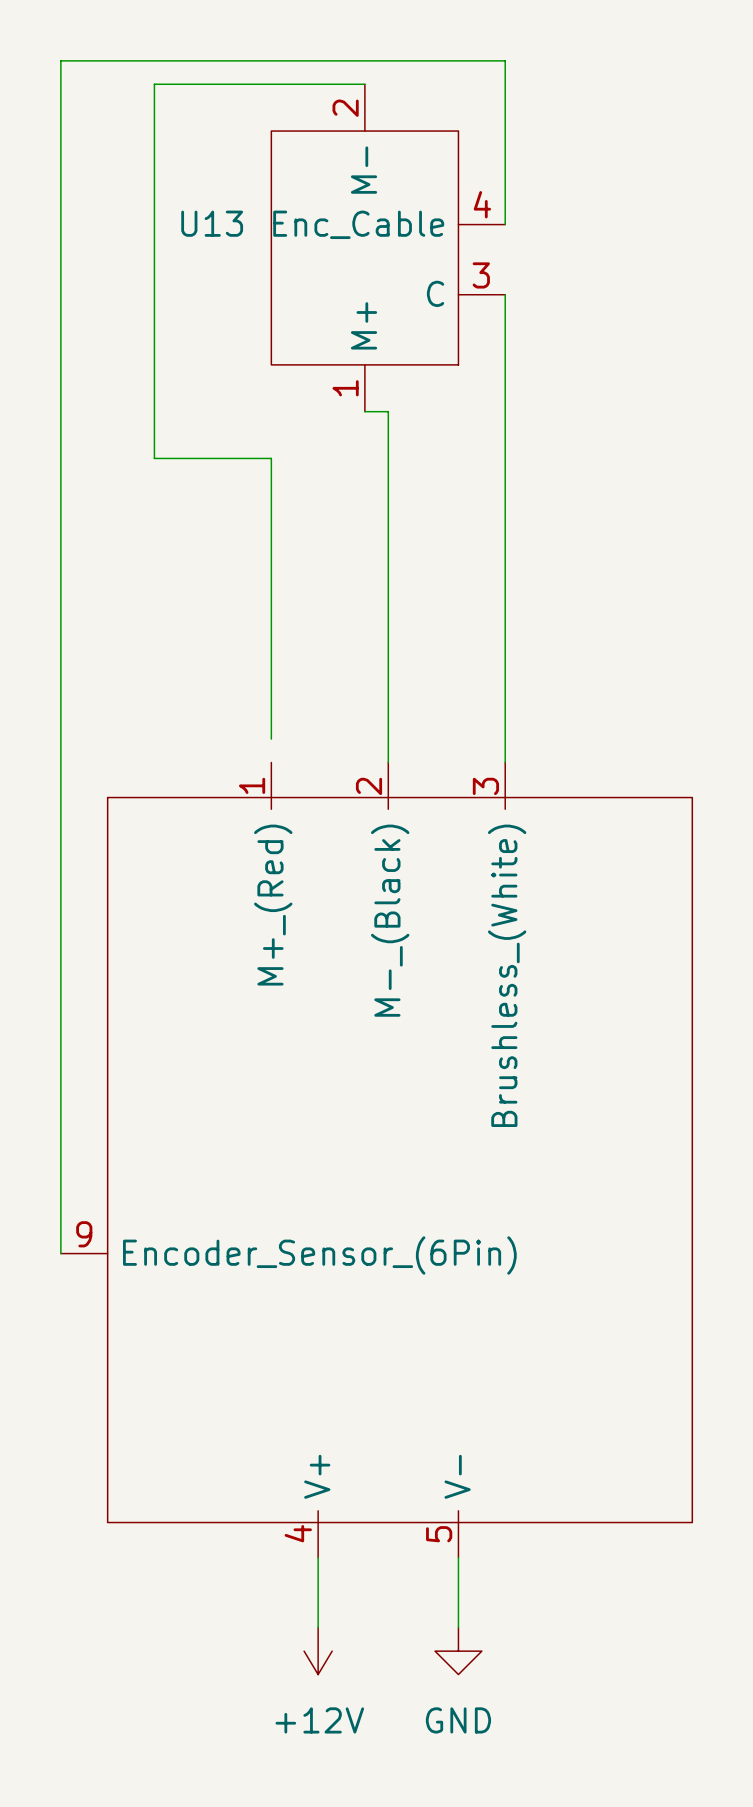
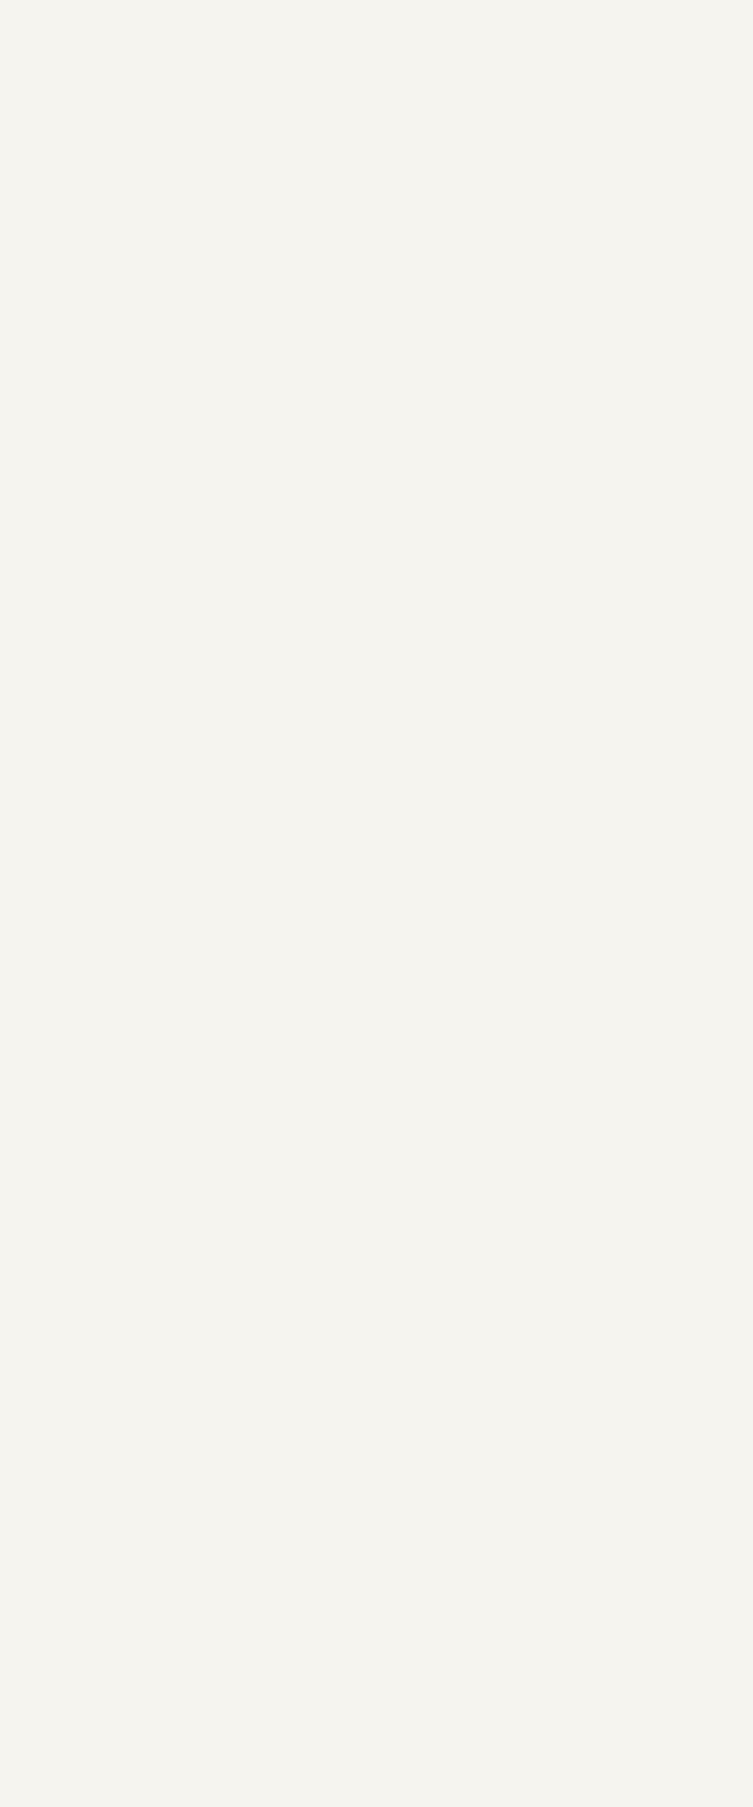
wire: (364, 84) (154, 84) (154, 458) (271, 458) (271, 739) -> none
wire: (505, 224) (505, 60) (60, 60) (60, 1253) -> none
U13: (388, 247) -> none
wire: (505, 294) (505, 762) -> none
wire: (364, 411) (388, 411) (388, 762) -> none
part: (376, 1160) -> none
wire: (318, 1557) (318, 1627) -> none
wire: (458, 1557) (458, 1627) -> none
power symbol: +12V (318, 1651) -> none
power symbol: GND (458, 1651) -> none

